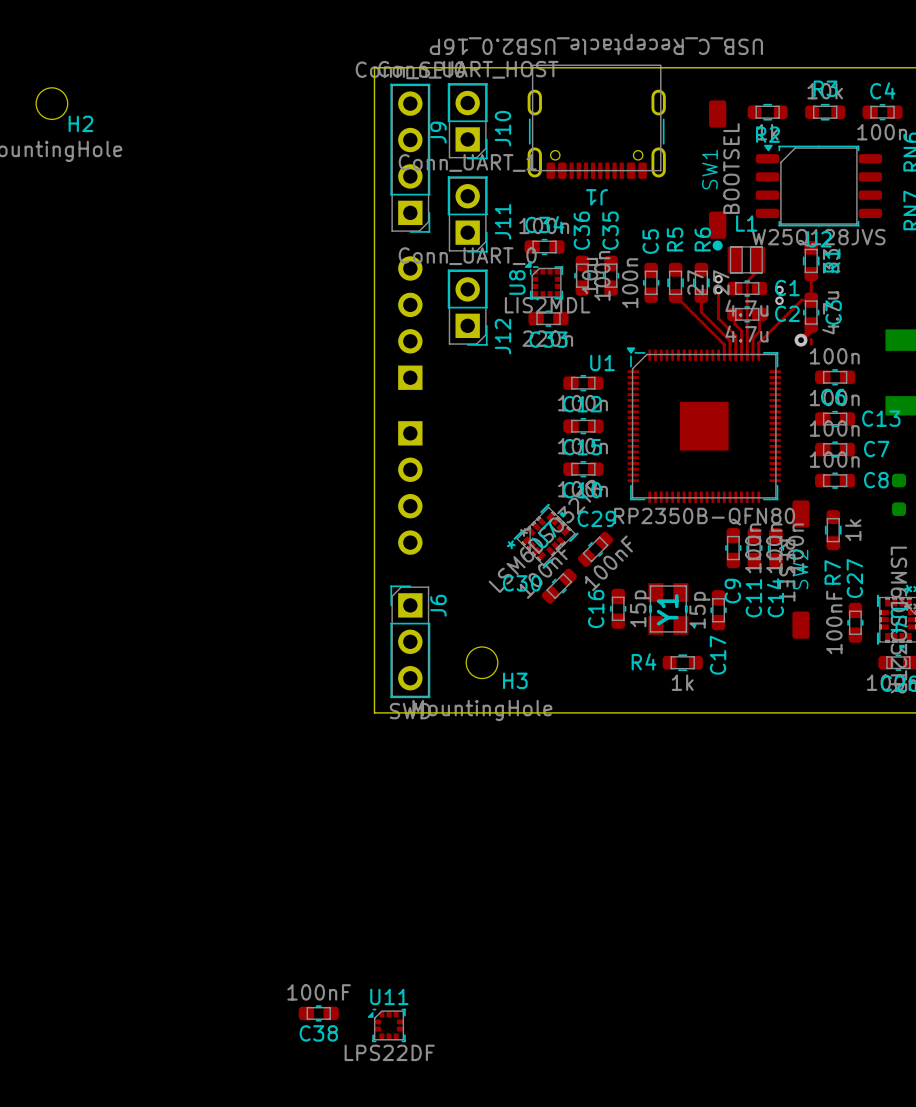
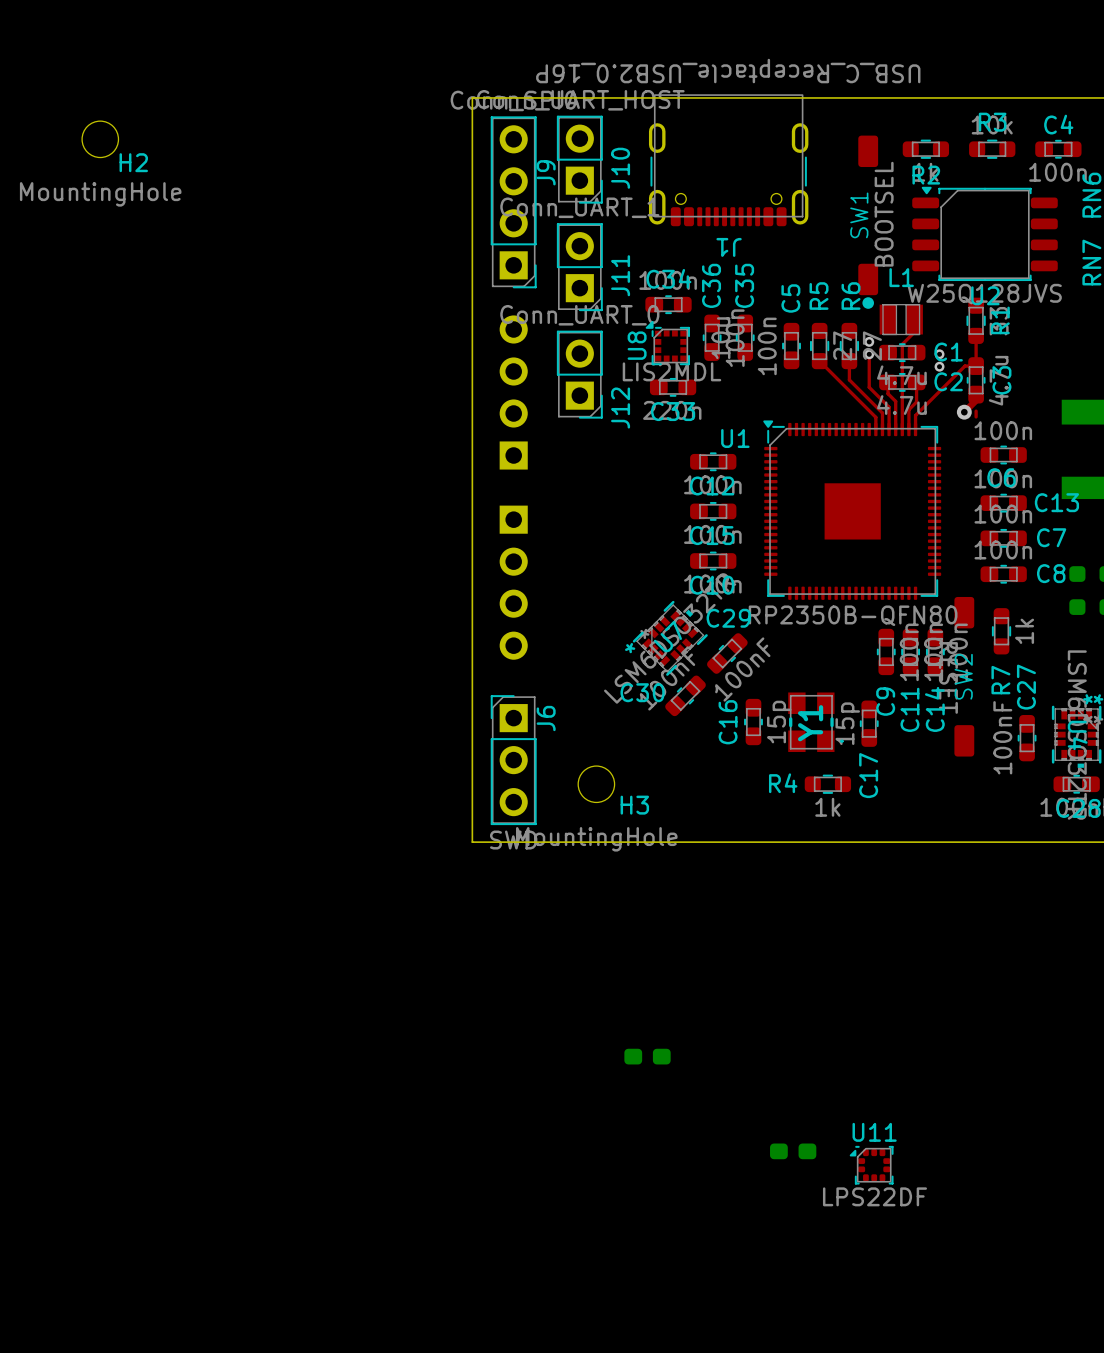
part: none -> (647, 1056)
C38 side: top (318, 1013) -> bottom (793, 1151)
U11 position: (386, 1025) -> (871, 1165)

